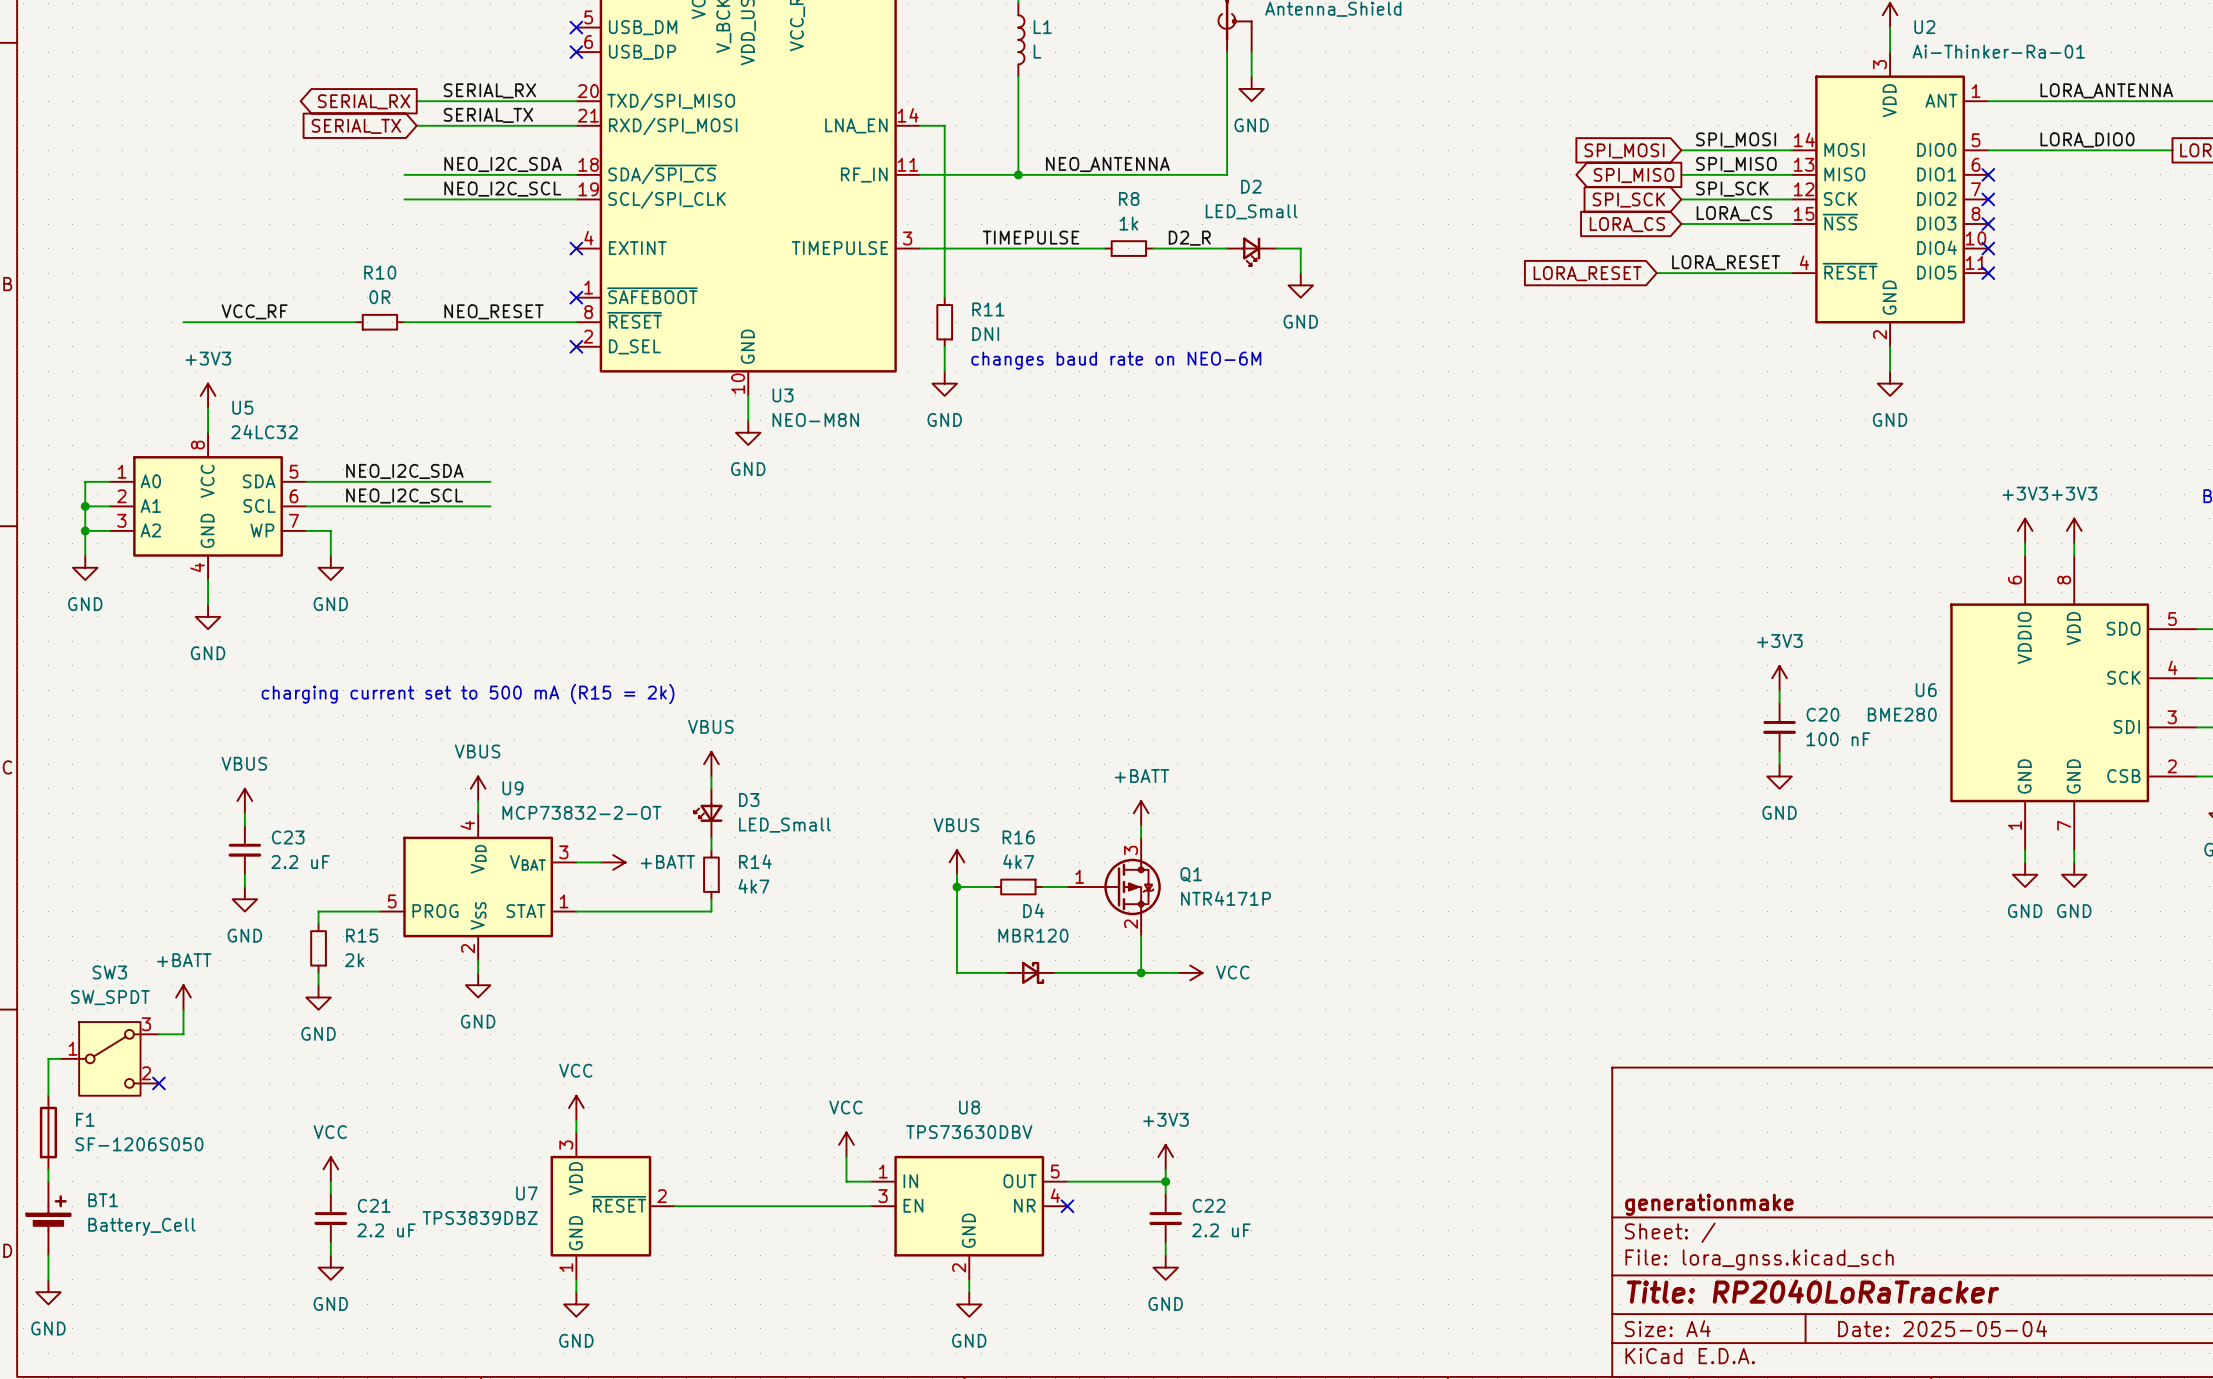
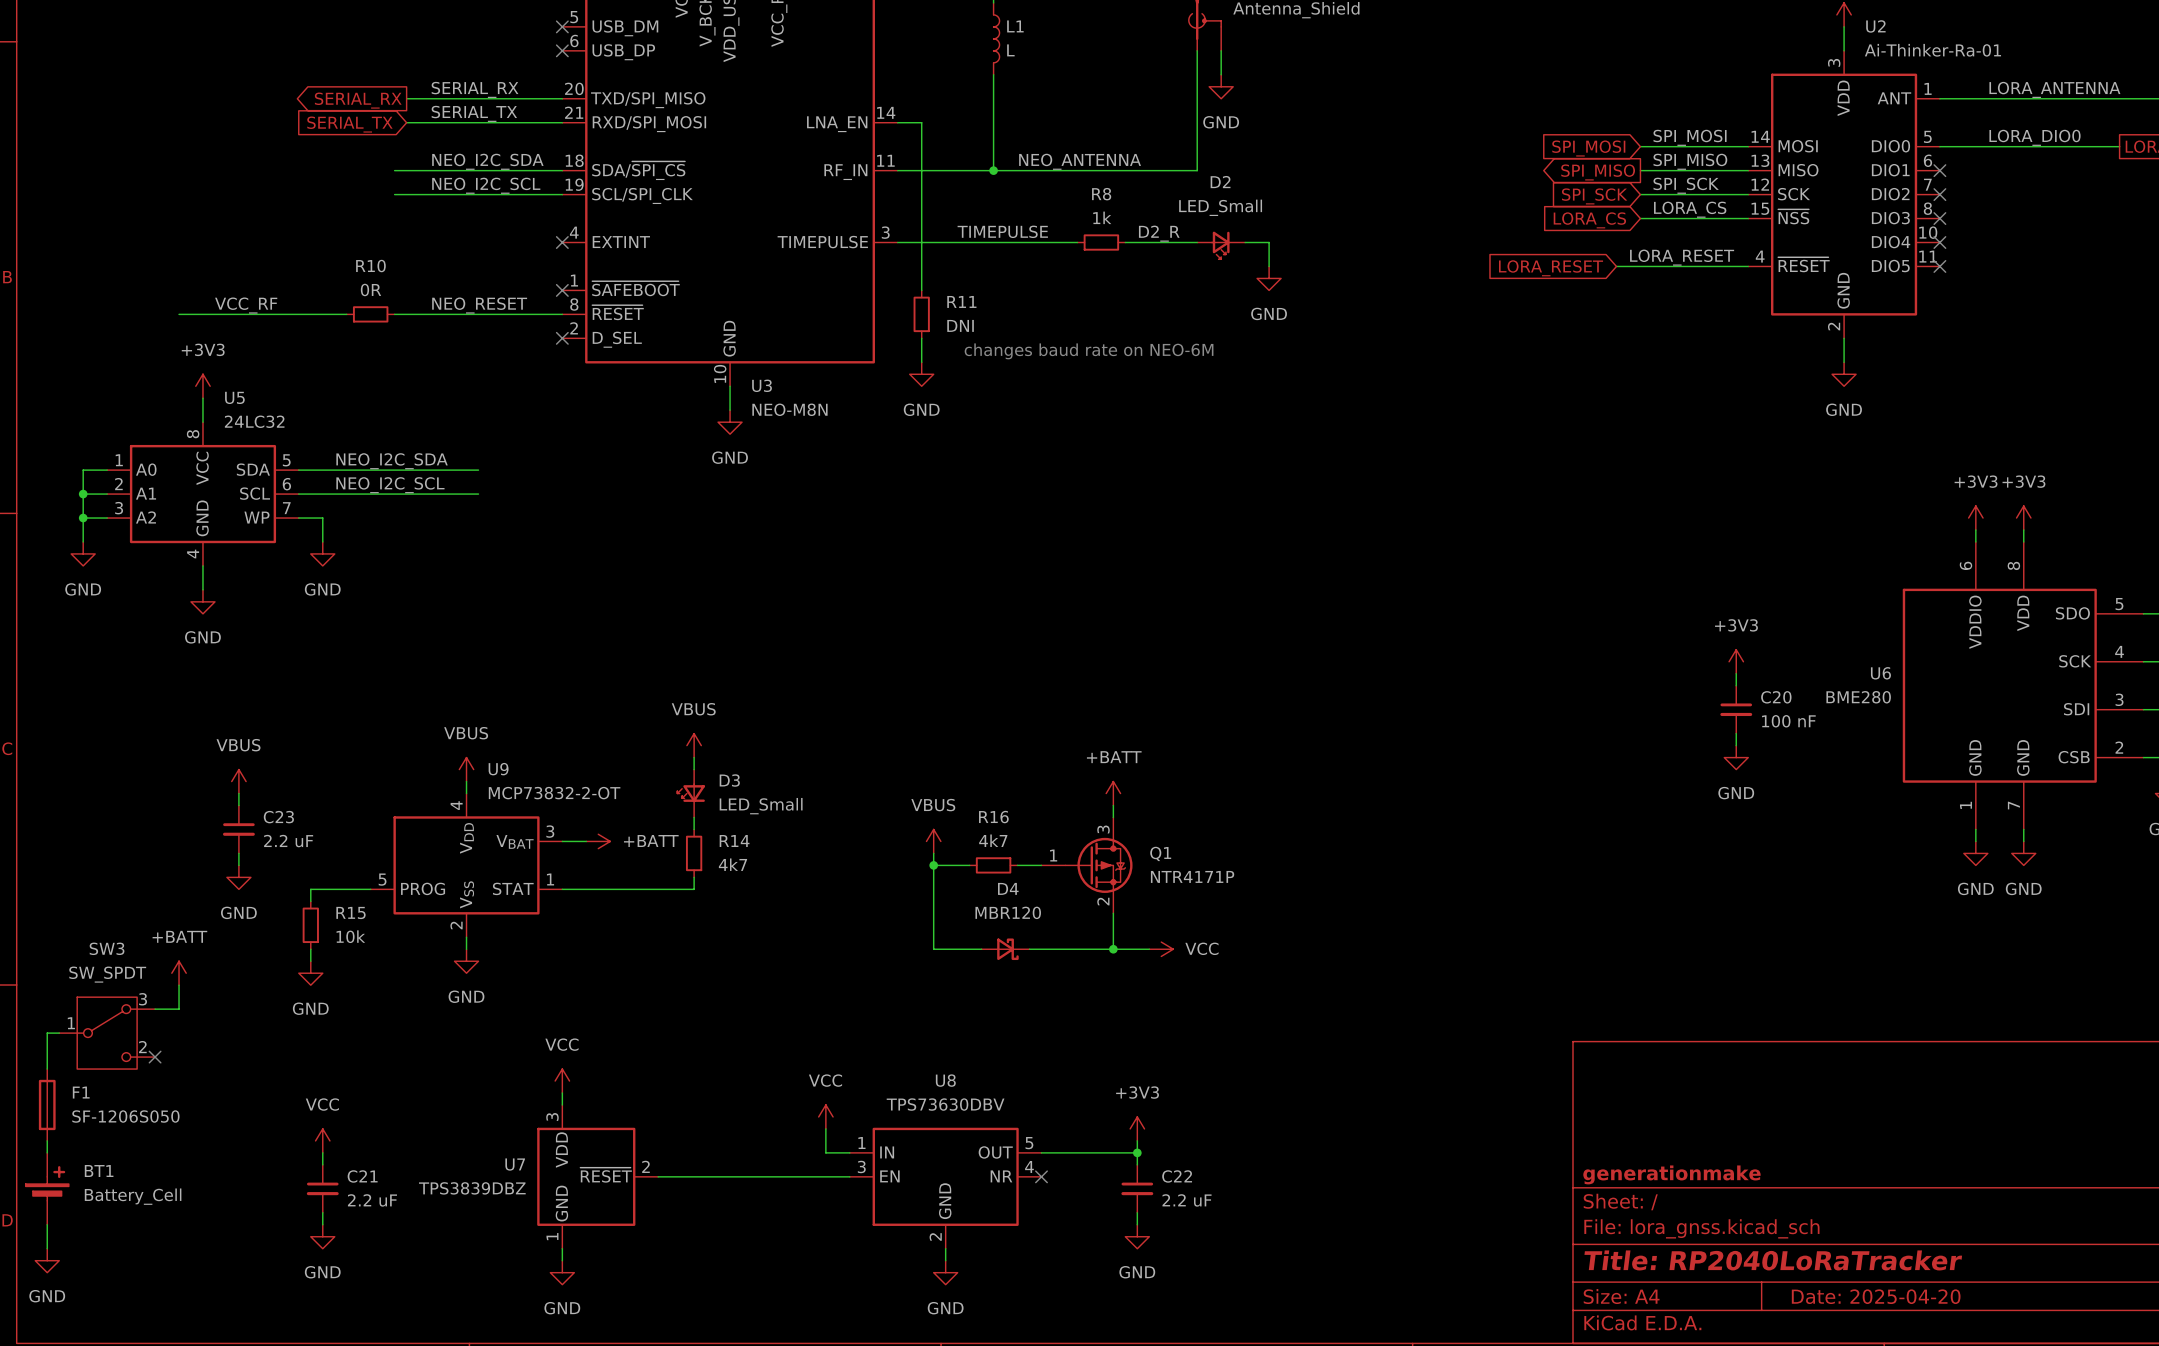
text: charging current set to 500 mA (R15 = 2k) (468, 694) -> none
R15 value: 2k (354, 960) -> 10k (350, 936)
title block: Date: 2025-05-04 (1942, 1328) -> Date: 2025-04-20 (1876, 1296)

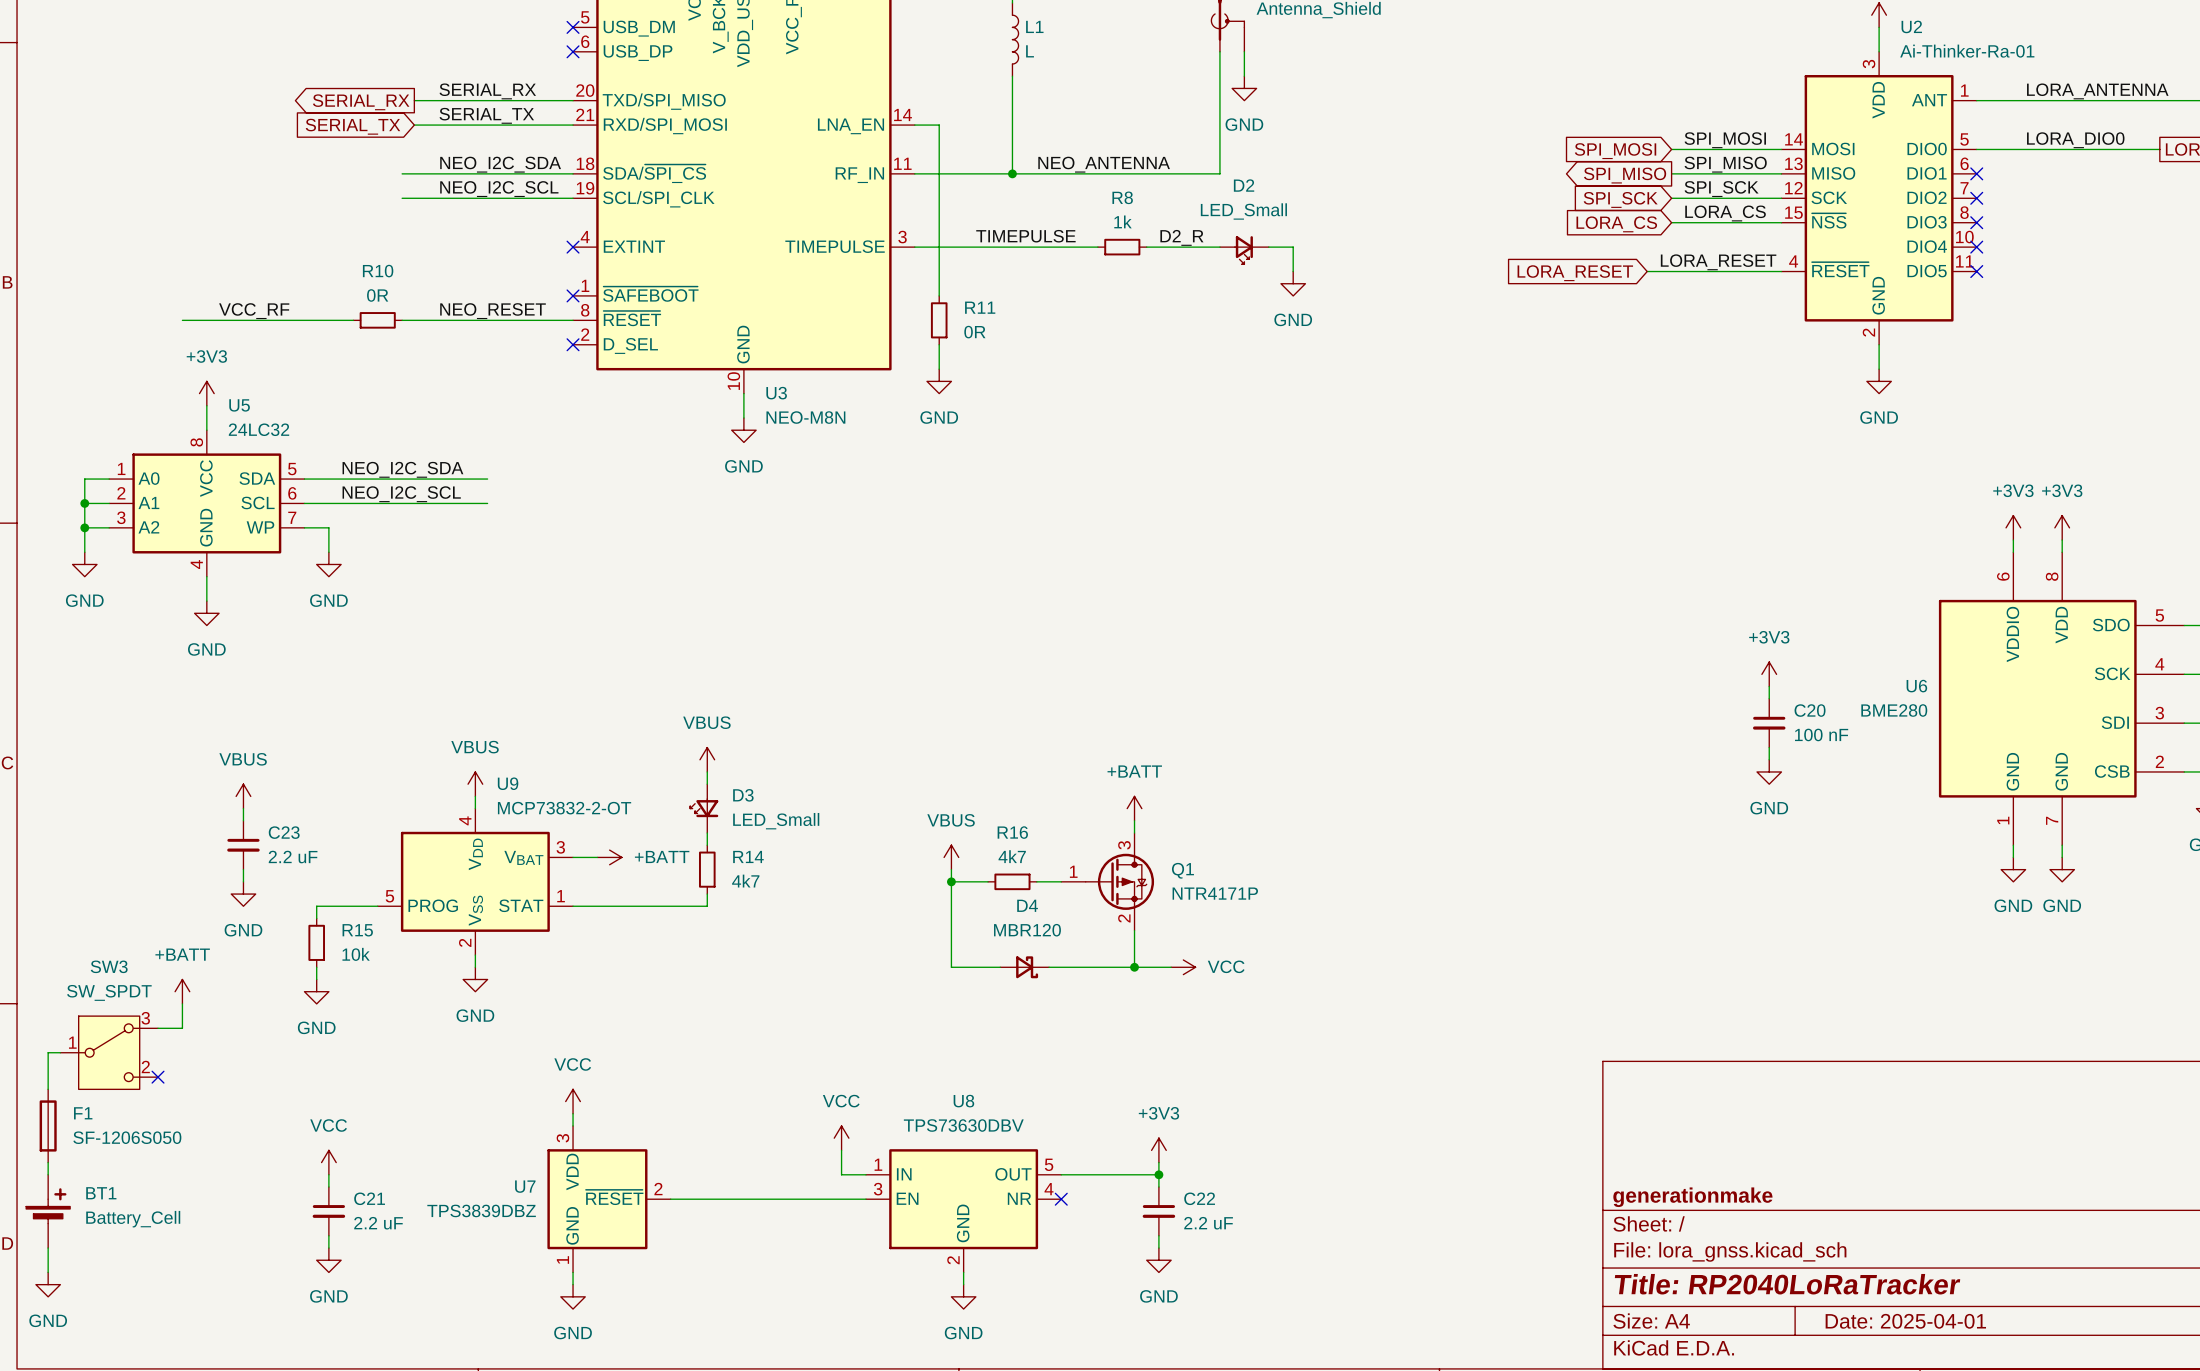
R11 value: DNI (960, 325) -> 0R (974, 332)
text: changes baud rate on NEO-6M (1089, 351) -> none
title block: Date: 2025-04-20 (1876, 1296) -> Date: 2025-04-01 (1905, 1321)

